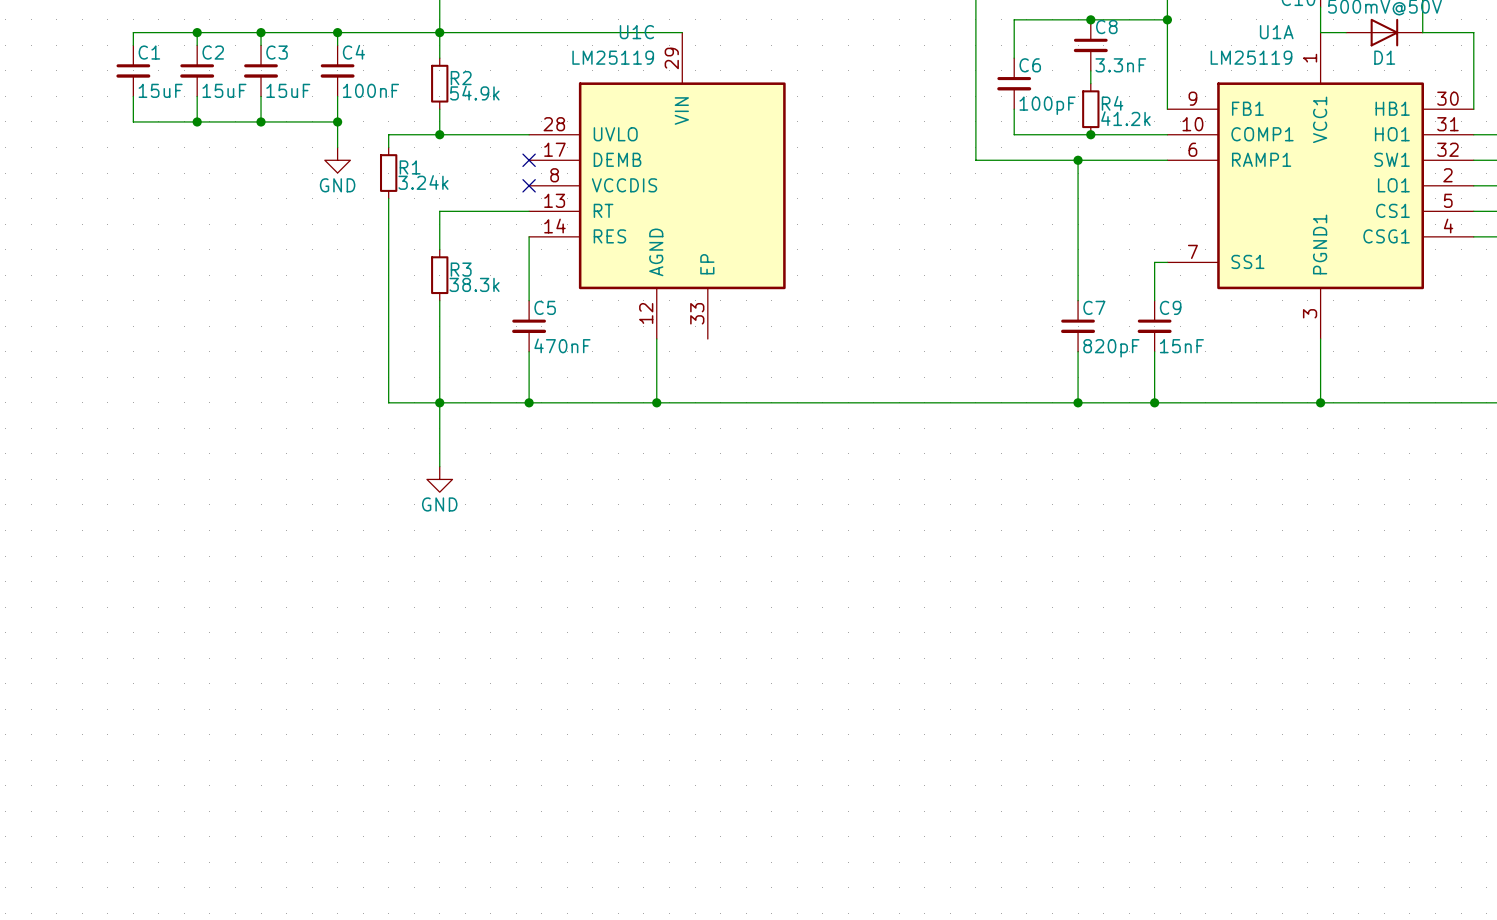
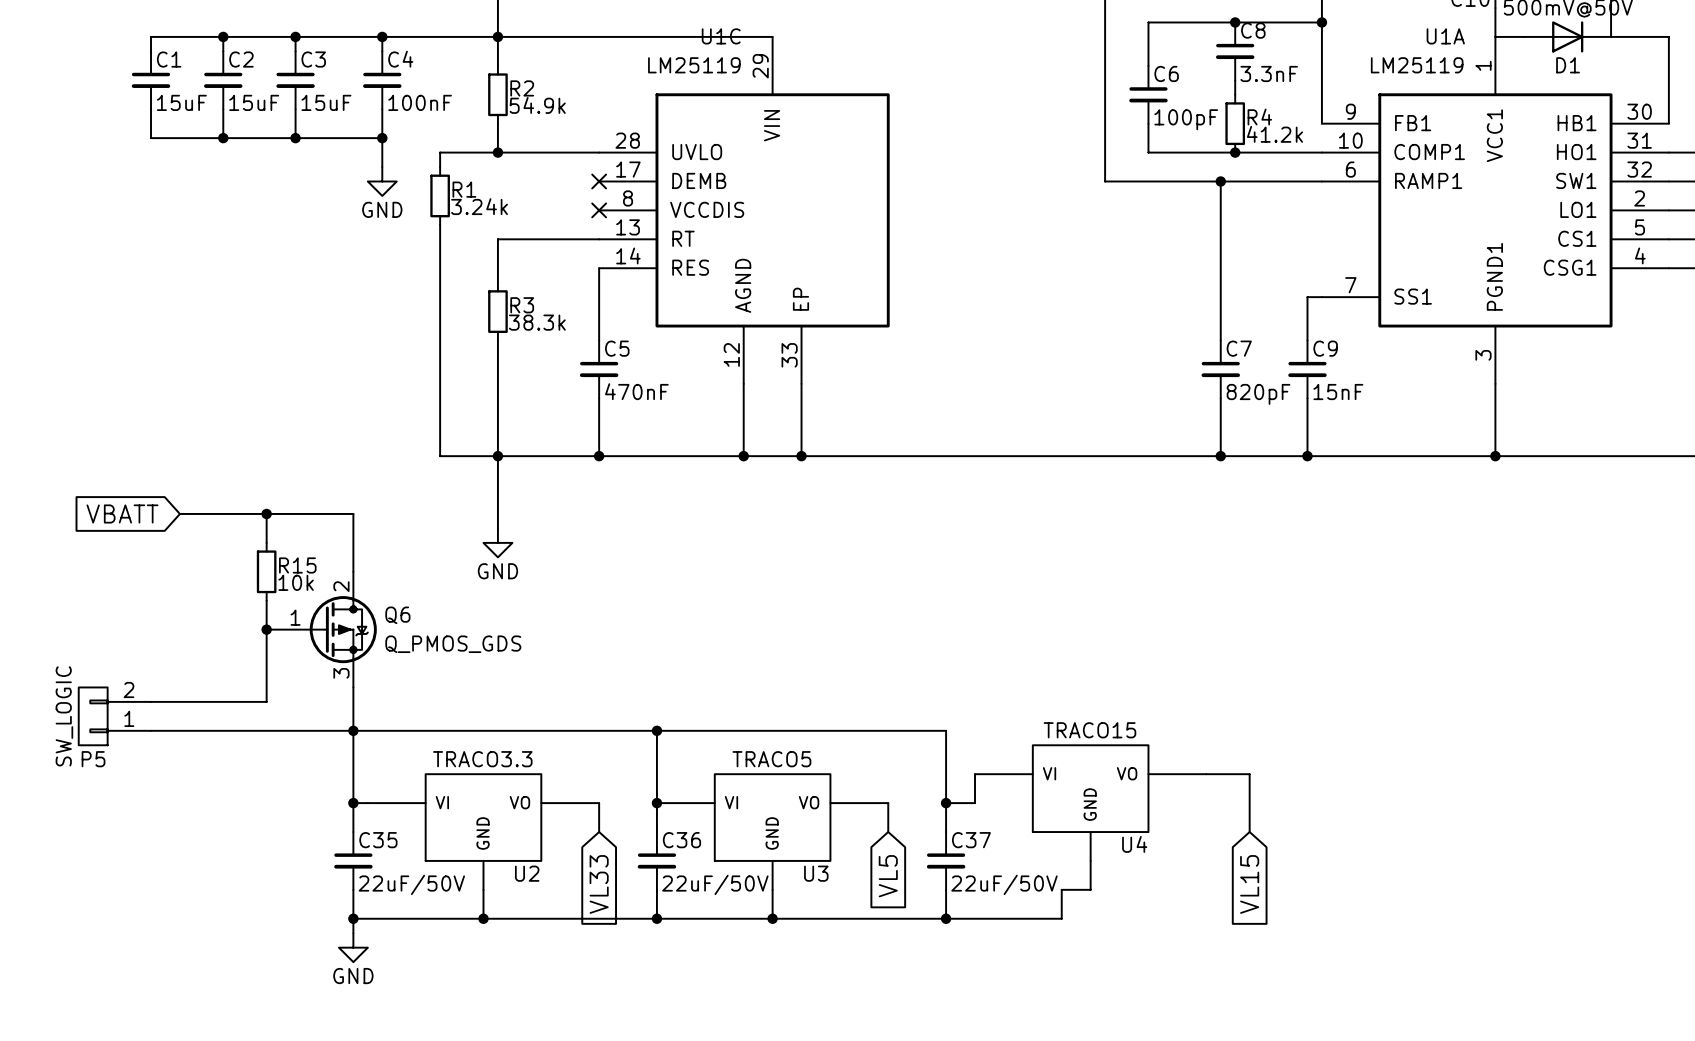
wire: none -> (801, 383) (801, 456)
junction: none -> (801, 456)
global label: none -> VBATT (122, 513)
wire: none -> (179, 513) (353, 513) (353, 571)
wire: none -> (266, 513) (266, 542)
junction: none -> (266, 513)
R15: none -> 10k (266, 571)
wire: none -> (266, 600) (266, 701) (151, 701)
junction: none -> (266, 629)
Q6: none -> Q_PMOS_GDS (321, 629)
wire: none -> (353, 687) (353, 832)
P5: none -> SW_LOGIC (114, 716)
wire: none -> (151, 730) (946, 730) (946, 832)
junction: none -> (353, 730)
wire: none -> (656, 730) (656, 832)
junction: none -> (656, 730)
wire: none -> (975, 774) (975, 803) (946, 803)
wire: none -> (1206, 774) (1249, 774) (1249, 832)
wire: none -> (353, 803) (367, 803)
junction: none -> (353, 803)
wire: none -> (599, 803) (599, 832)
junction: none -> (656, 803)
wire: none -> (888, 803) (888, 832)
junction: none -> (946, 803)
U4: none -> TRACO15 (1090, 803)
U2: none -> TRACO3.3 (483, 832)
U3: none -> TRACO5 (772, 832)
C35: none -> 22uF/50V (353, 860)
C36: none -> 22uF/50V (656, 860)
C37: none -> 22uF/50V (946, 860)
wire: none -> (1090, 860) (1090, 889) (1061, 889) (1061, 918) (353, 918)
global label: none -> VL5 (888, 876)
global label: none -> VL33 (599, 884)
global label: none -> VL15 (1249, 884)
wire: none -> (353, 889) (353, 933)
wire: none -> (483, 889) (483, 918)
wire: none -> (656, 889) (656, 918)
wire: none -> (772, 889) (772, 918)
wire: none -> (946, 889) (946, 918)
junction: none -> (353, 918)
junction: none -> (483, 918)
junction: none -> (656, 918)
junction: none -> (772, 918)
junction: none -> (946, 918)
power symbol: none -> GND (353, 947)

